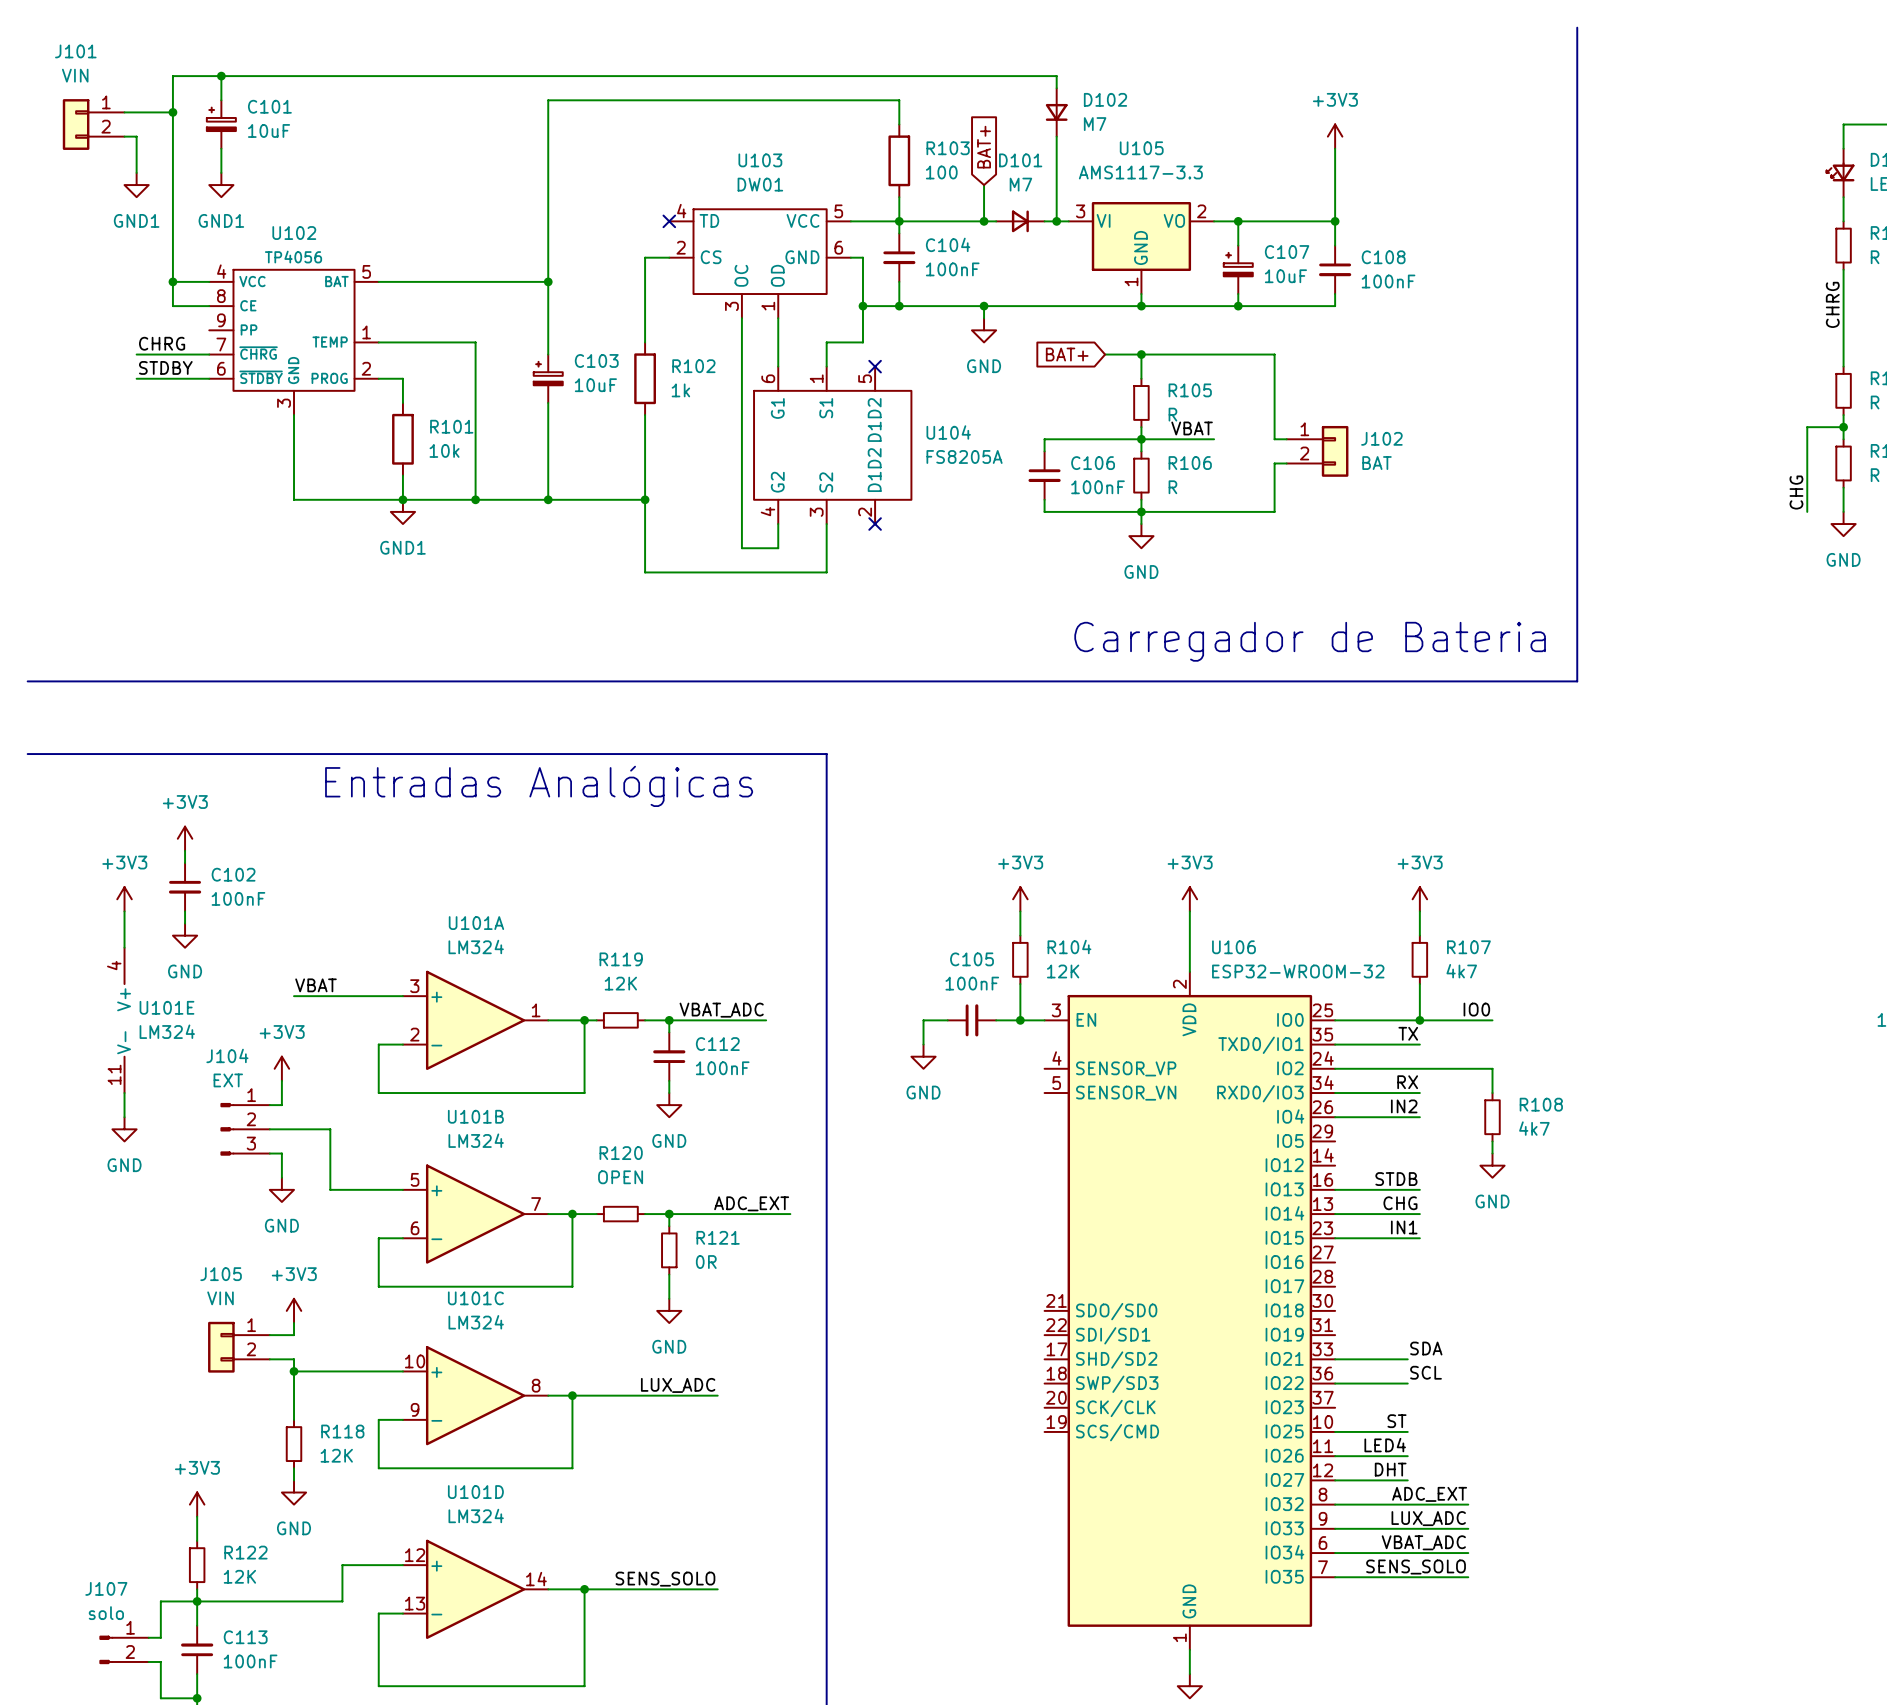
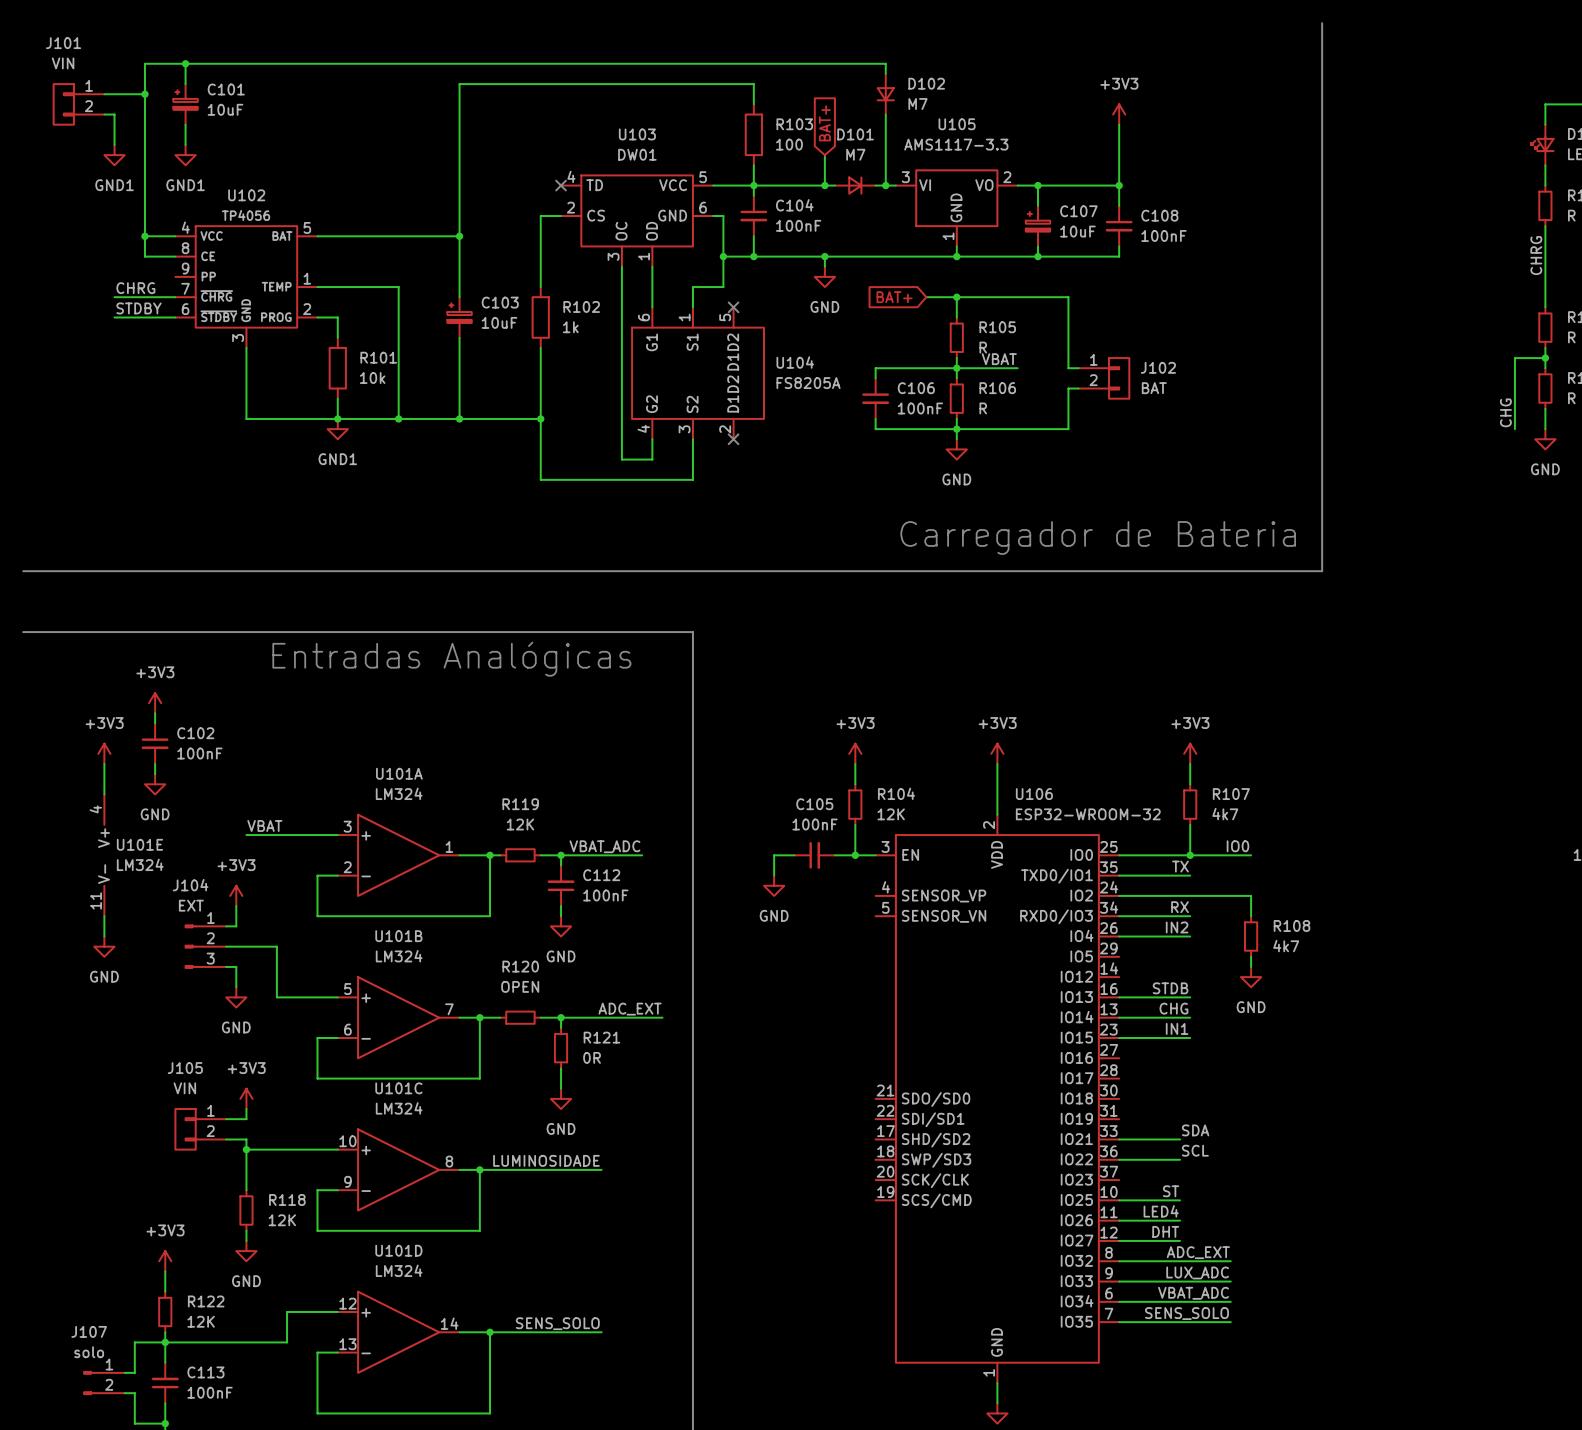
label: LUX_ADC (678, 1385) -> LUMINOSIDADE (546, 1160)

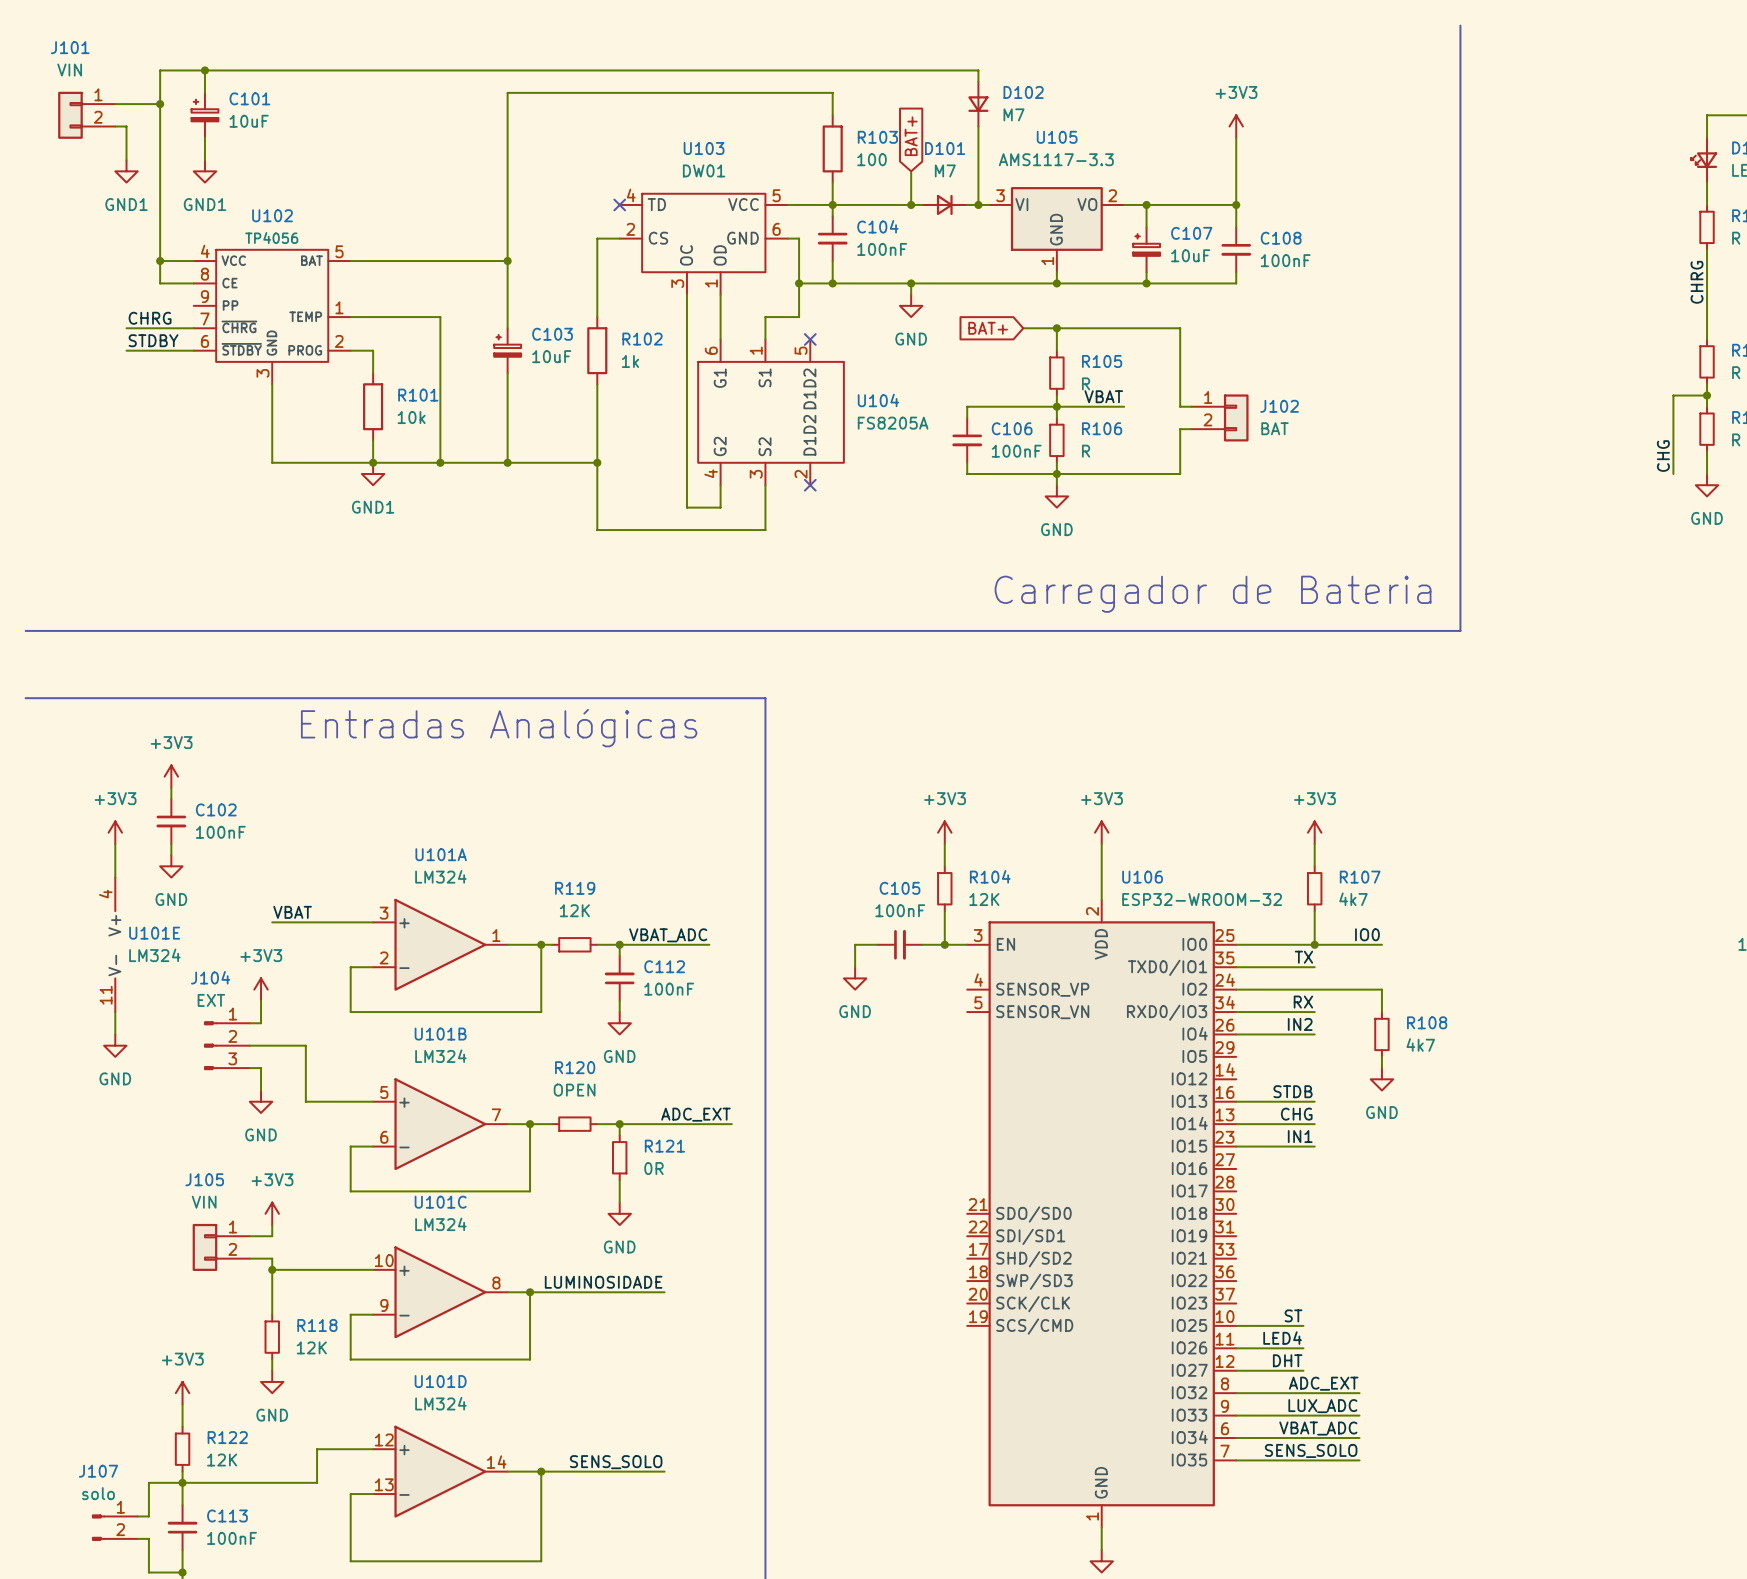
label: SDA (1195, 1130) -> none
wire: (1119, 1139) (1180, 1139) -> none
label: SCL (1195, 1150) -> none
wire: (1119, 1159) (1180, 1159) -> none

